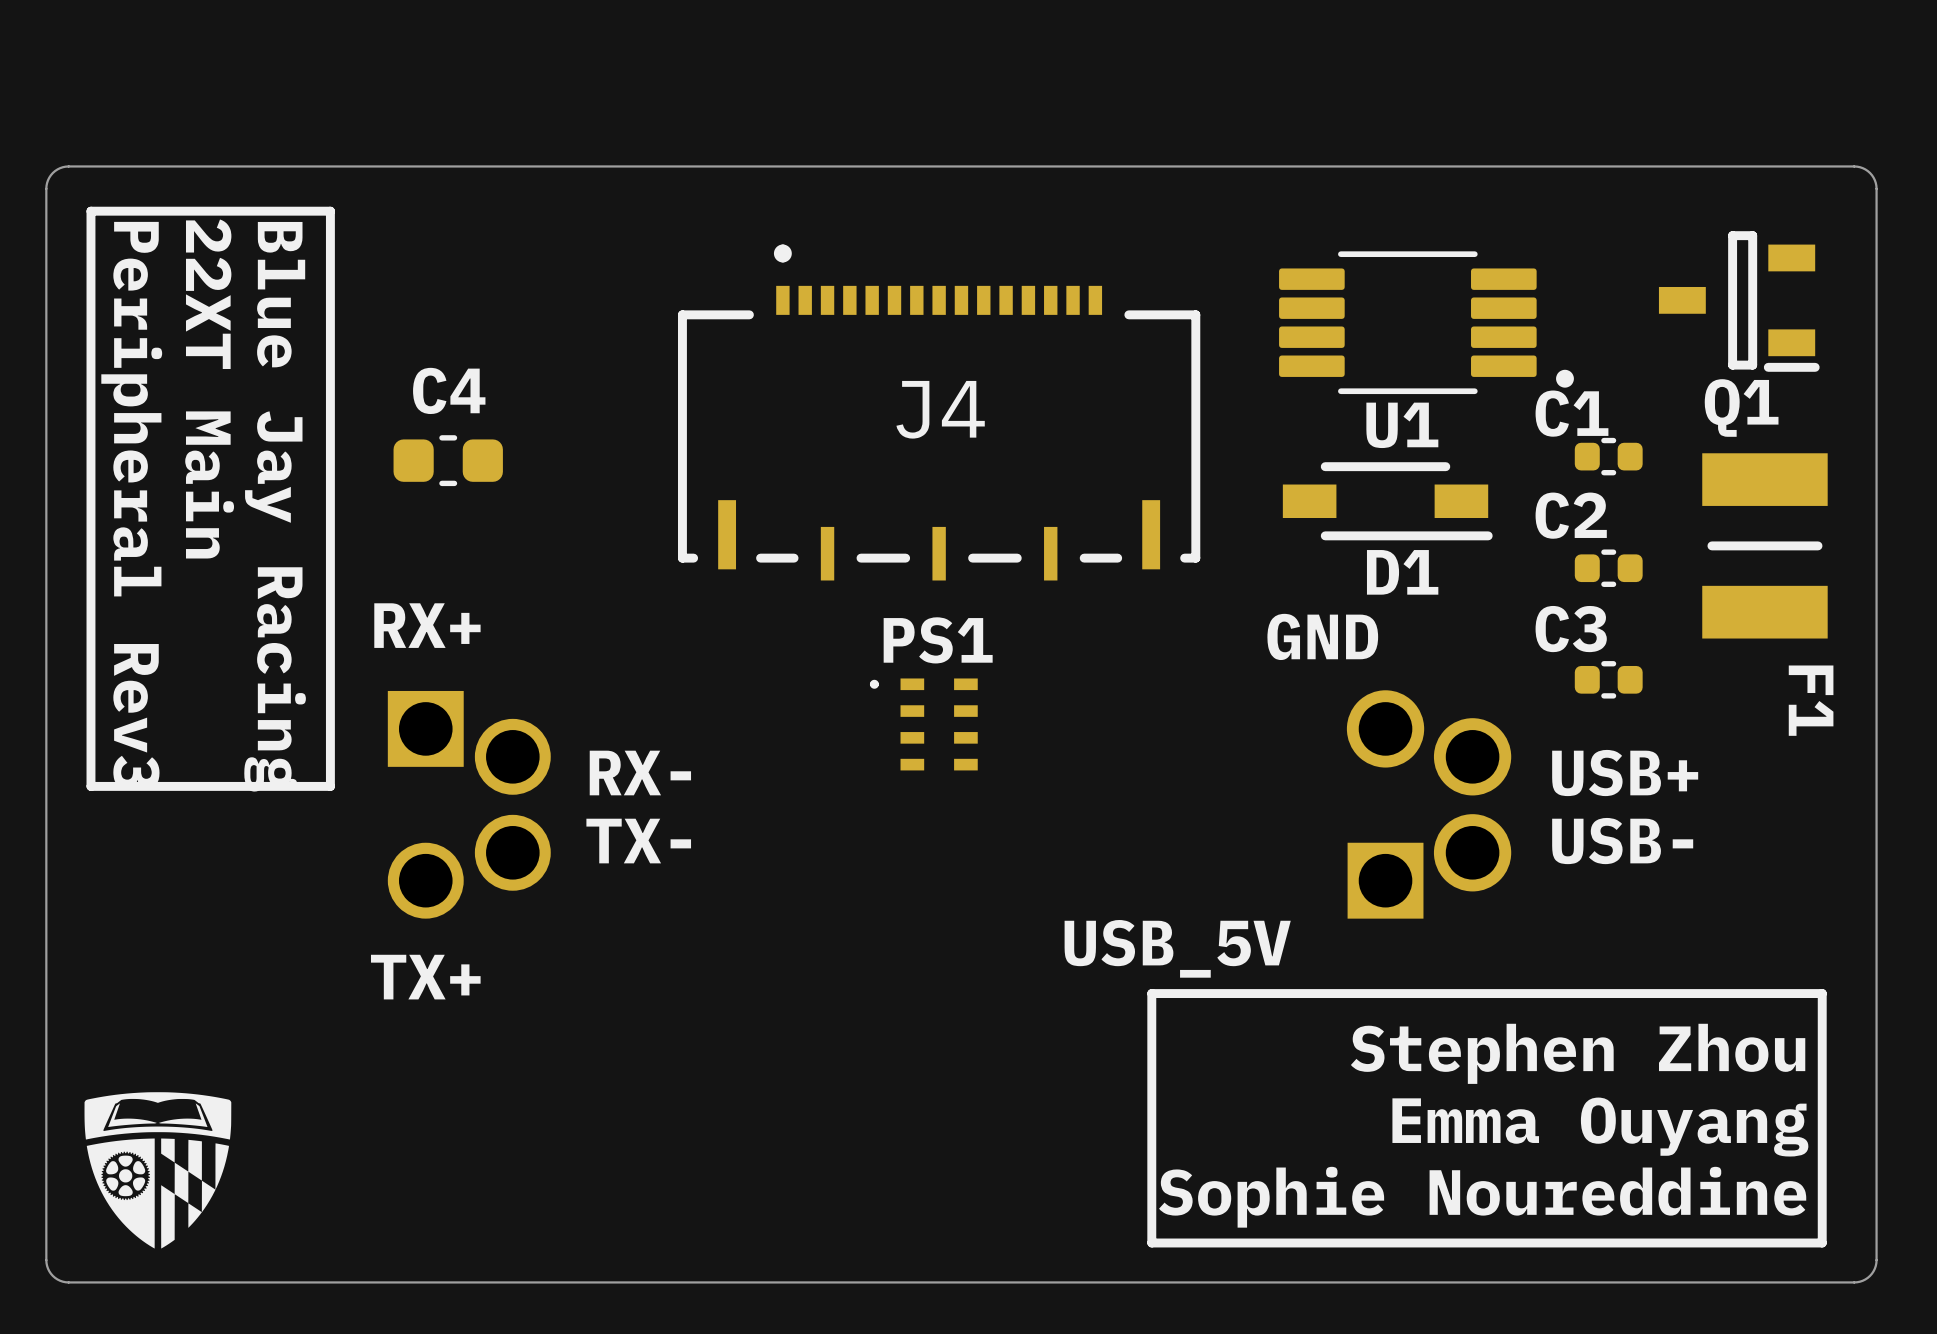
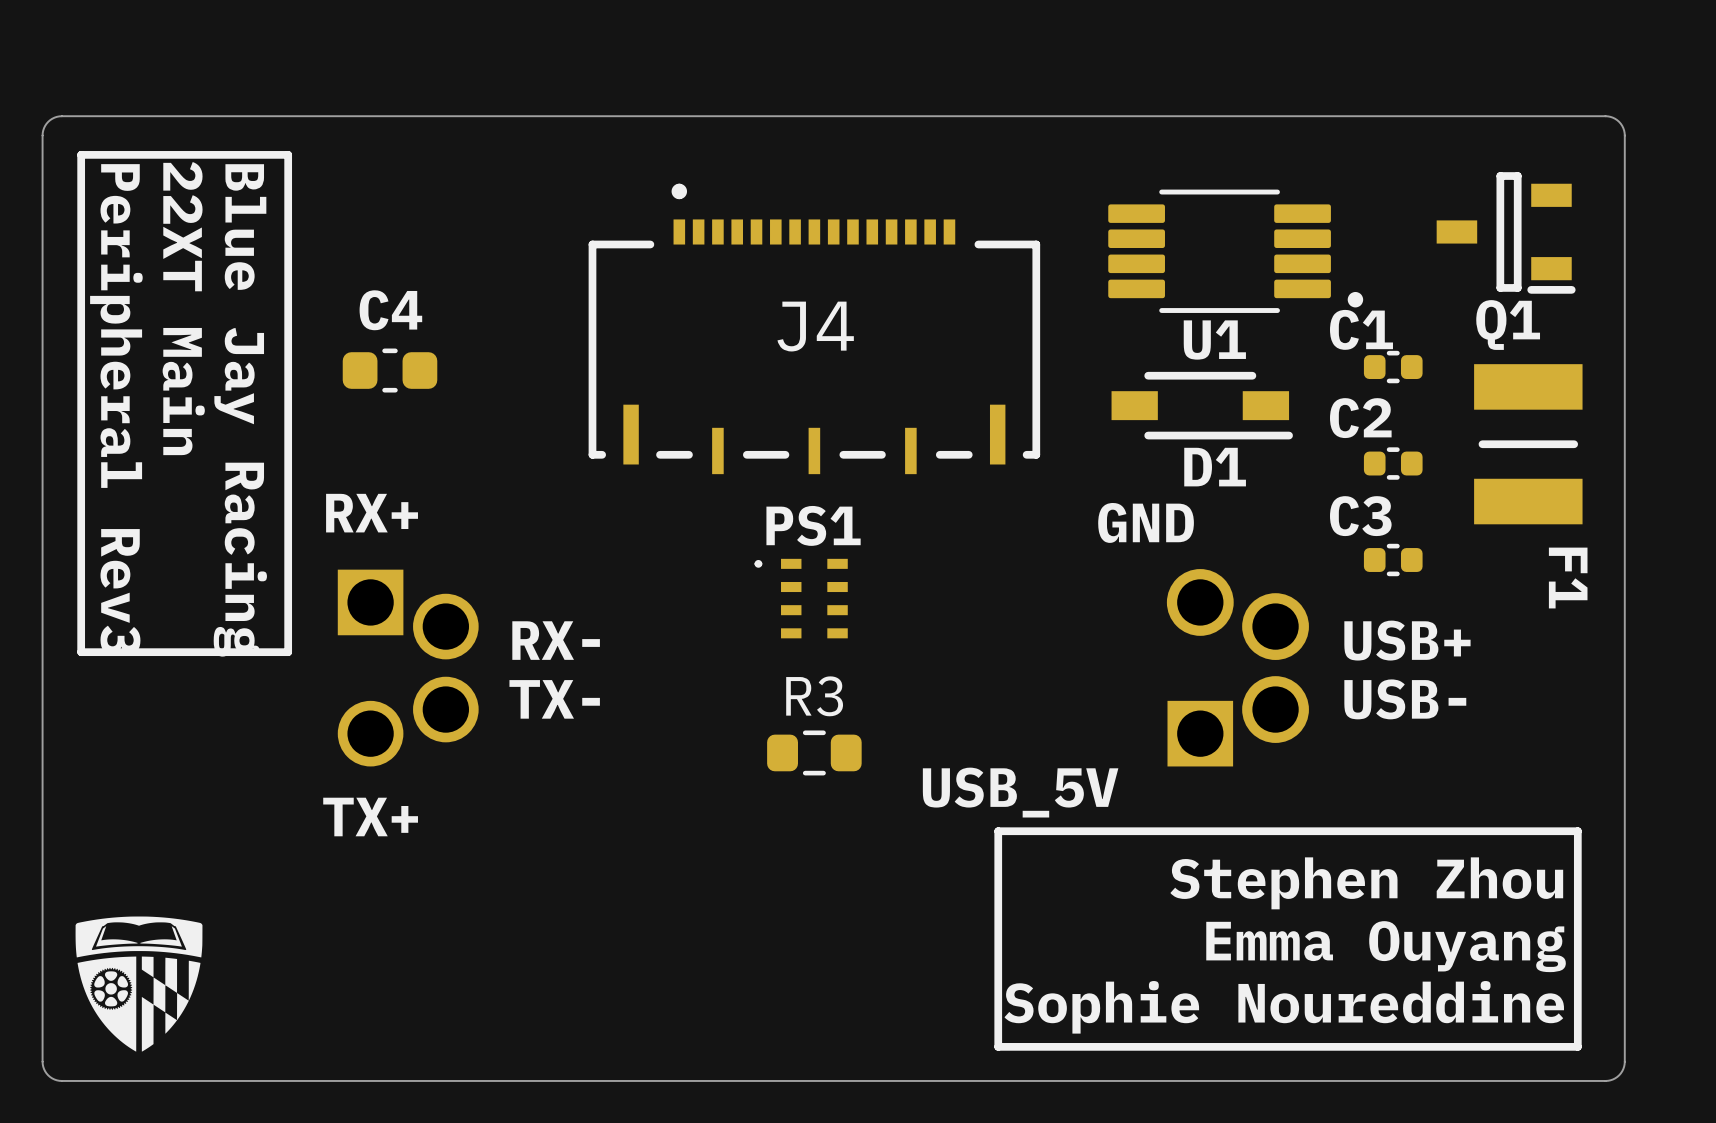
R3: none -> (814, 752)

